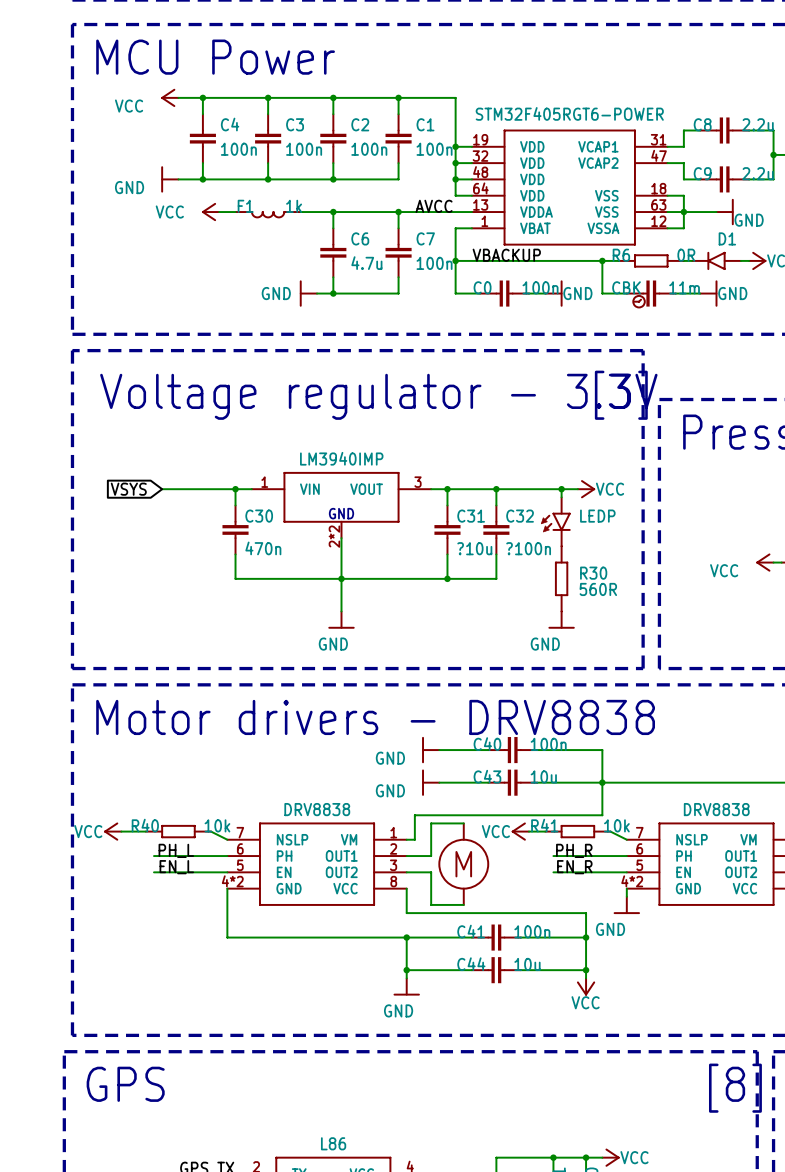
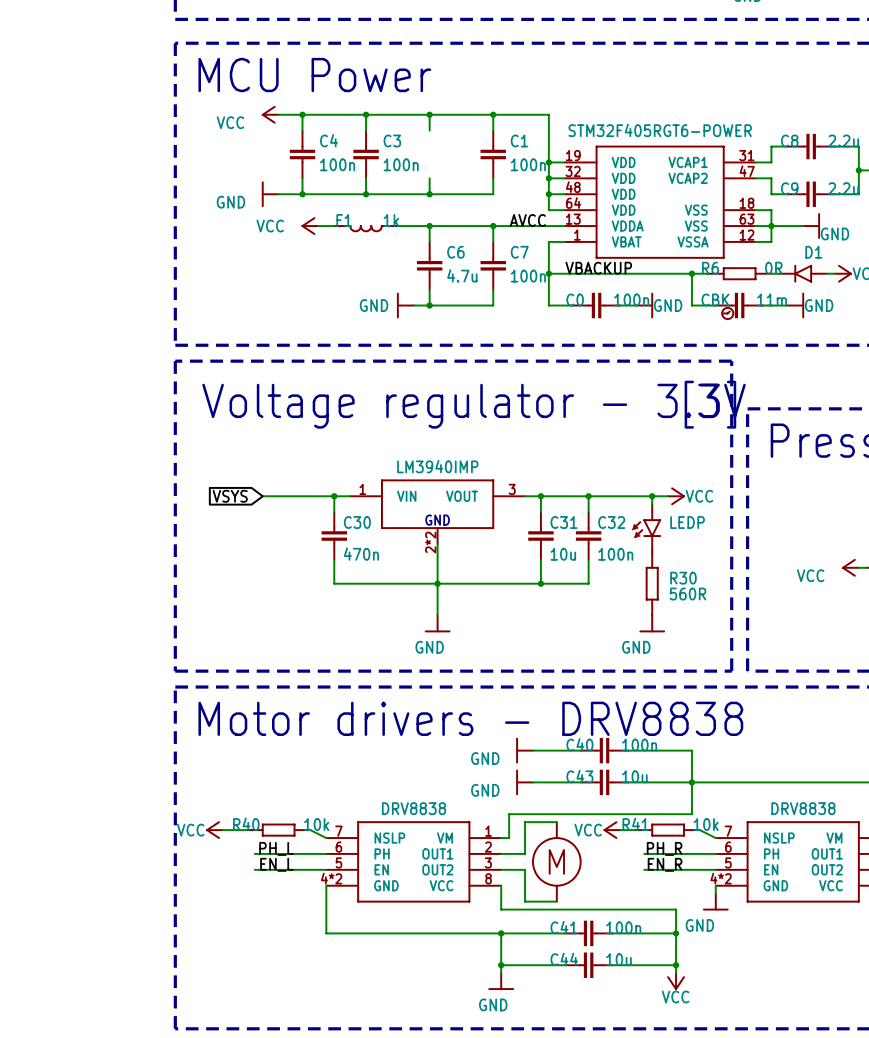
C2: 100n (333, 138) -> none
C31 value: ?10u (474, 548) -> 10u (563, 554)
C32 value: ?100n (528, 548) -> 100n (615, 554)

